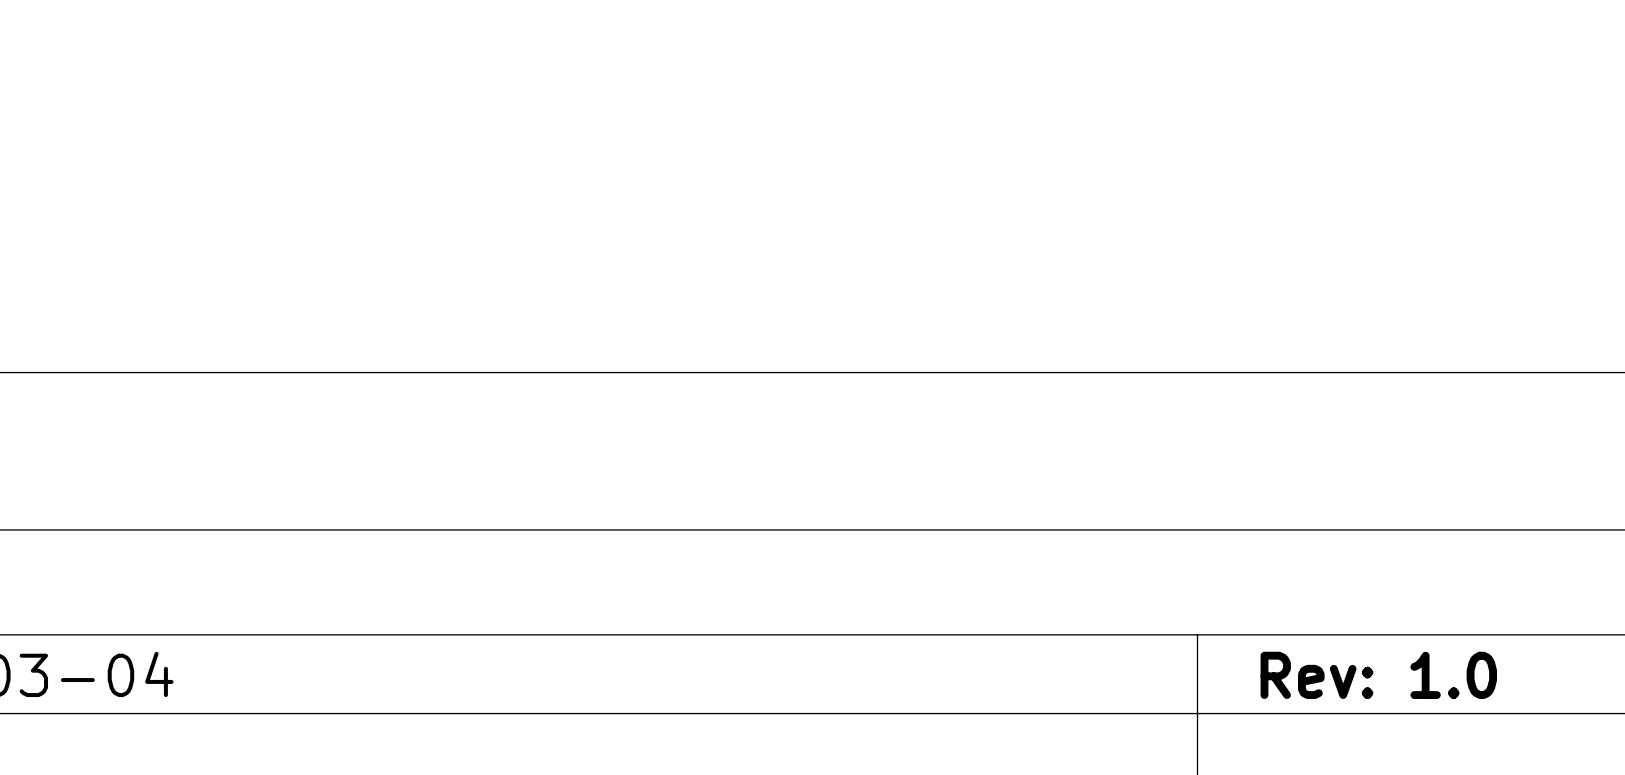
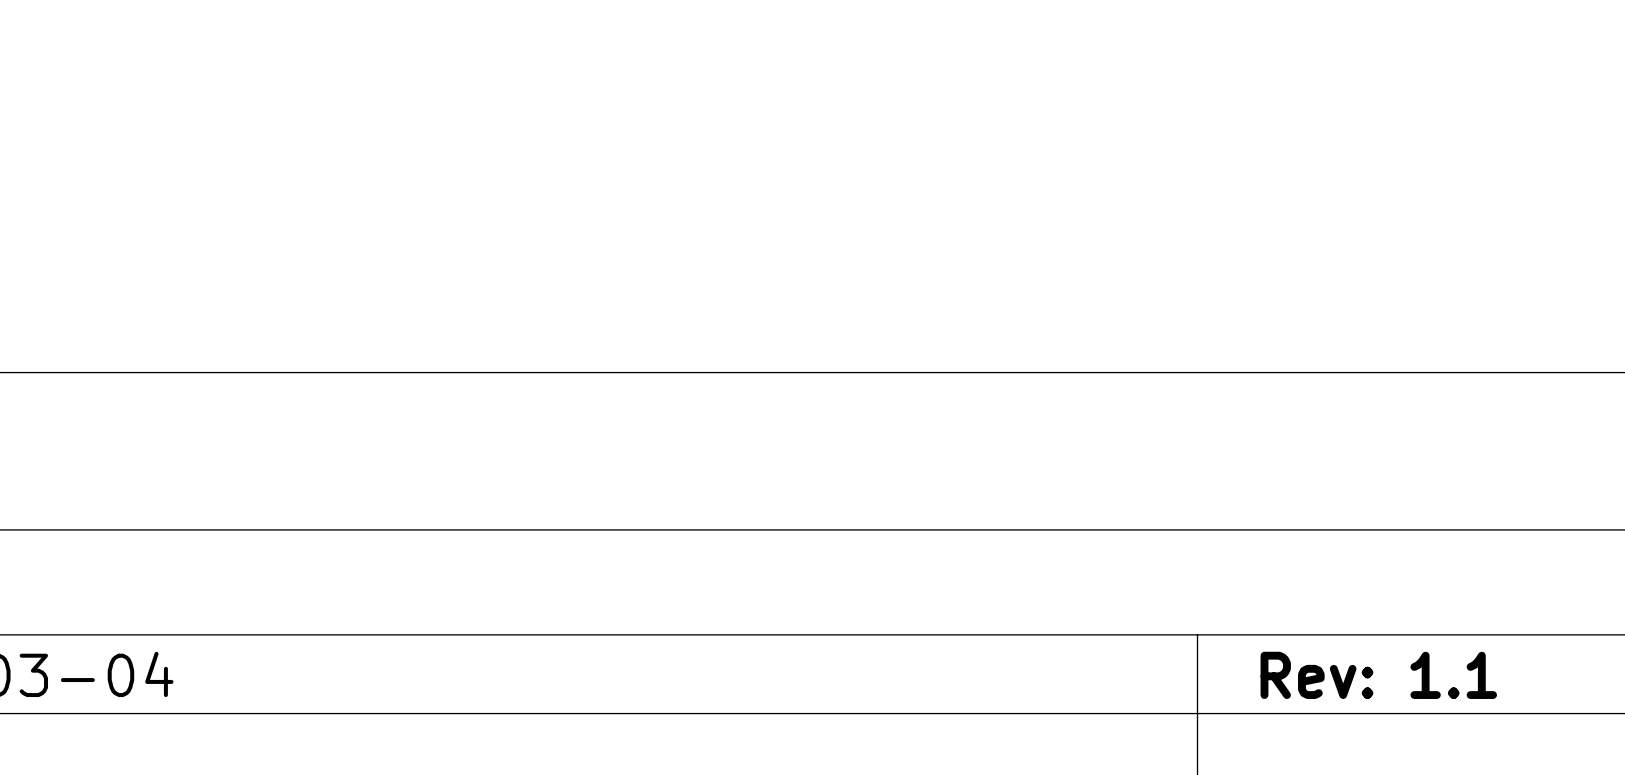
title block: Rev: 1.0 (1378, 675) -> Rev: 1.1 (1378, 675)

